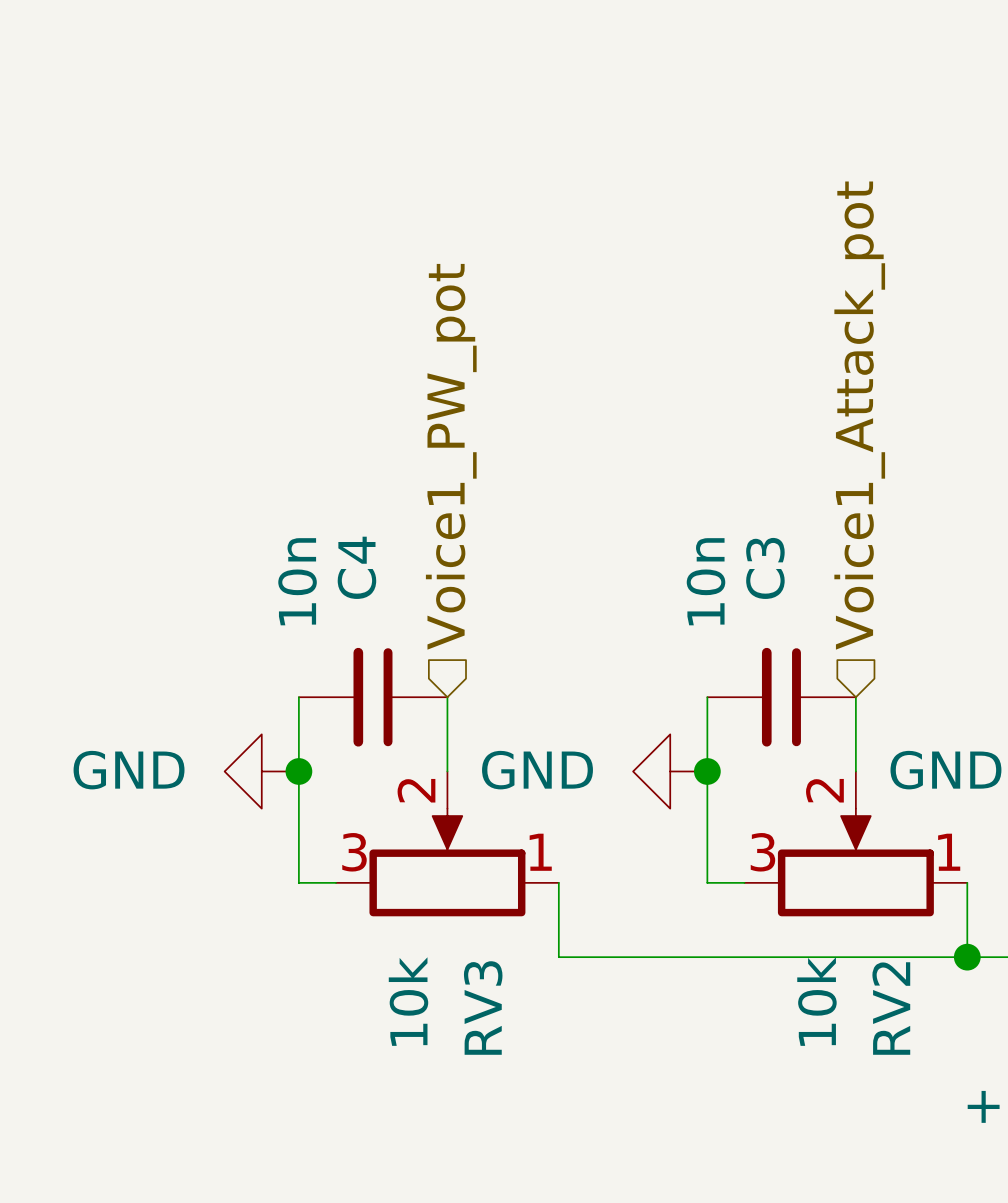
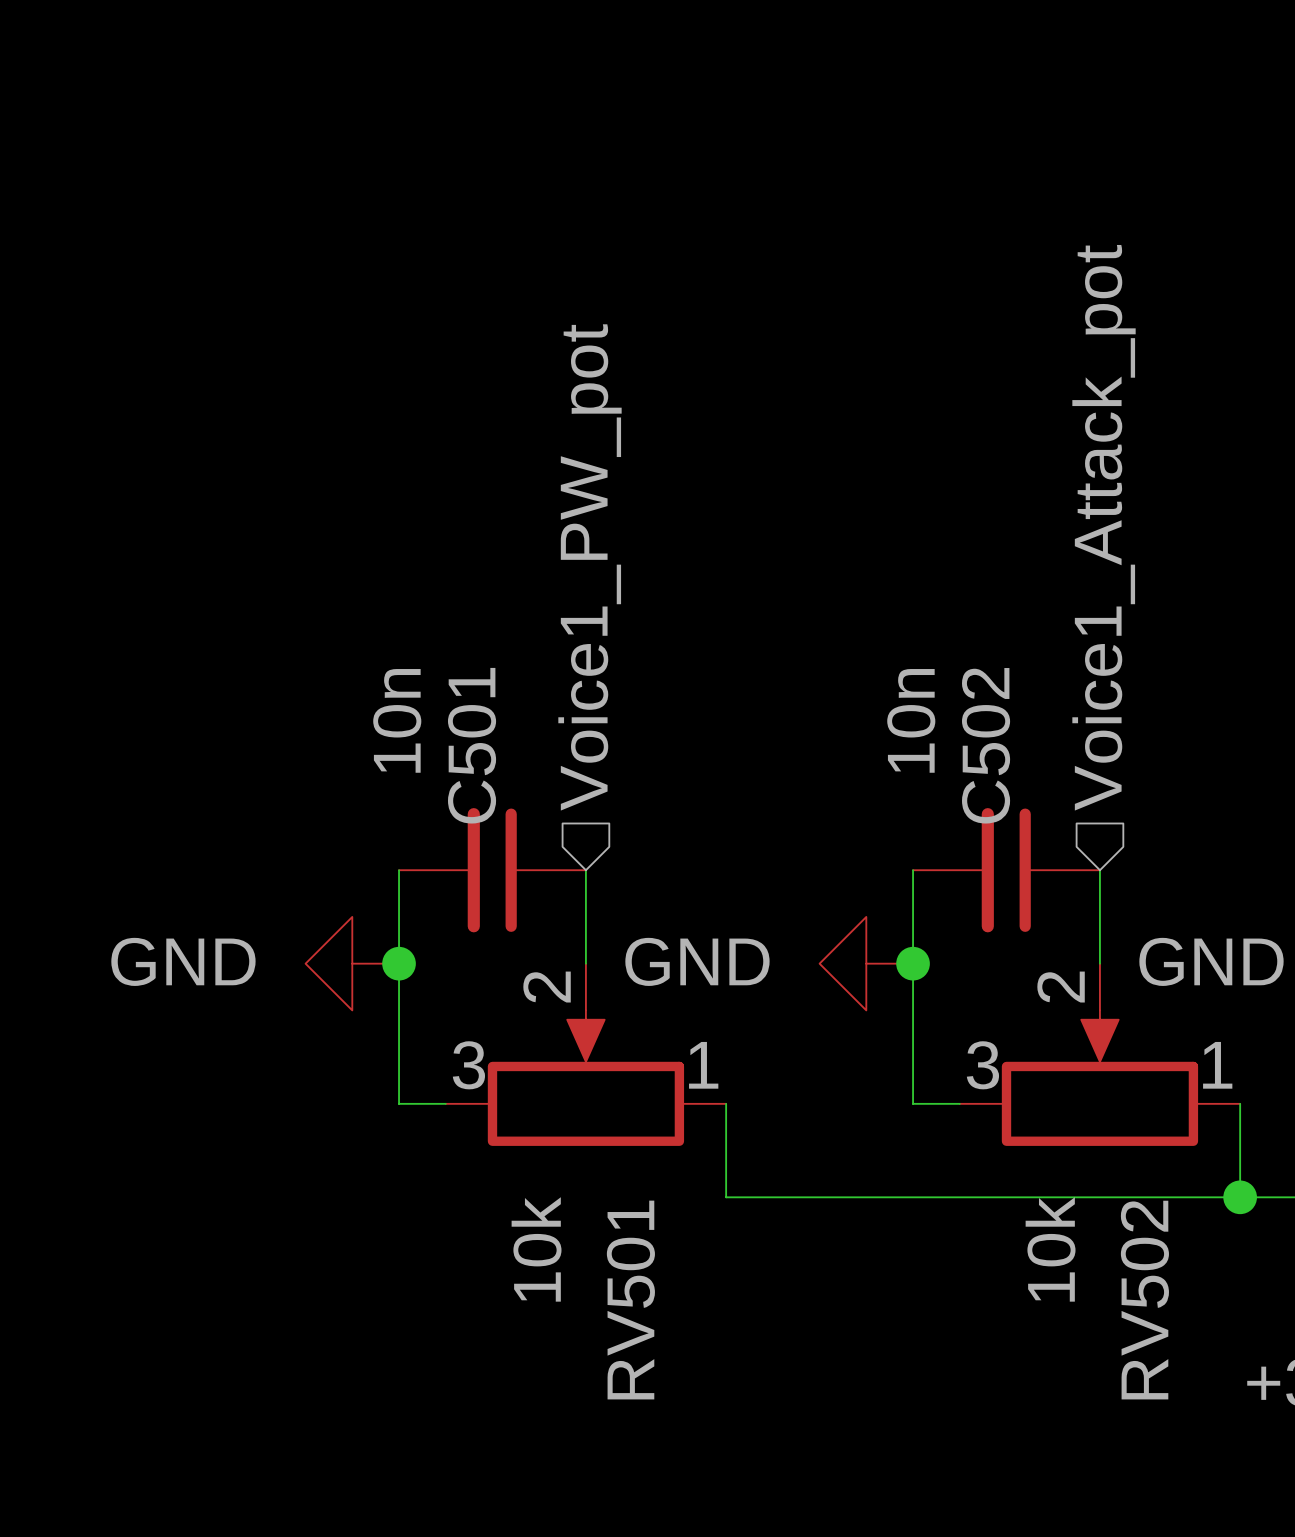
C4 name: C4 (356, 567) -> C501 (472, 745)
C3 name: C3 (765, 568) -> C502 (986, 745)
RV3 name: RV3 (483, 1008) -> RV501 (630, 1300)
RV2 name: RV2 (891, 1008) -> RV502 (1144, 1300)

